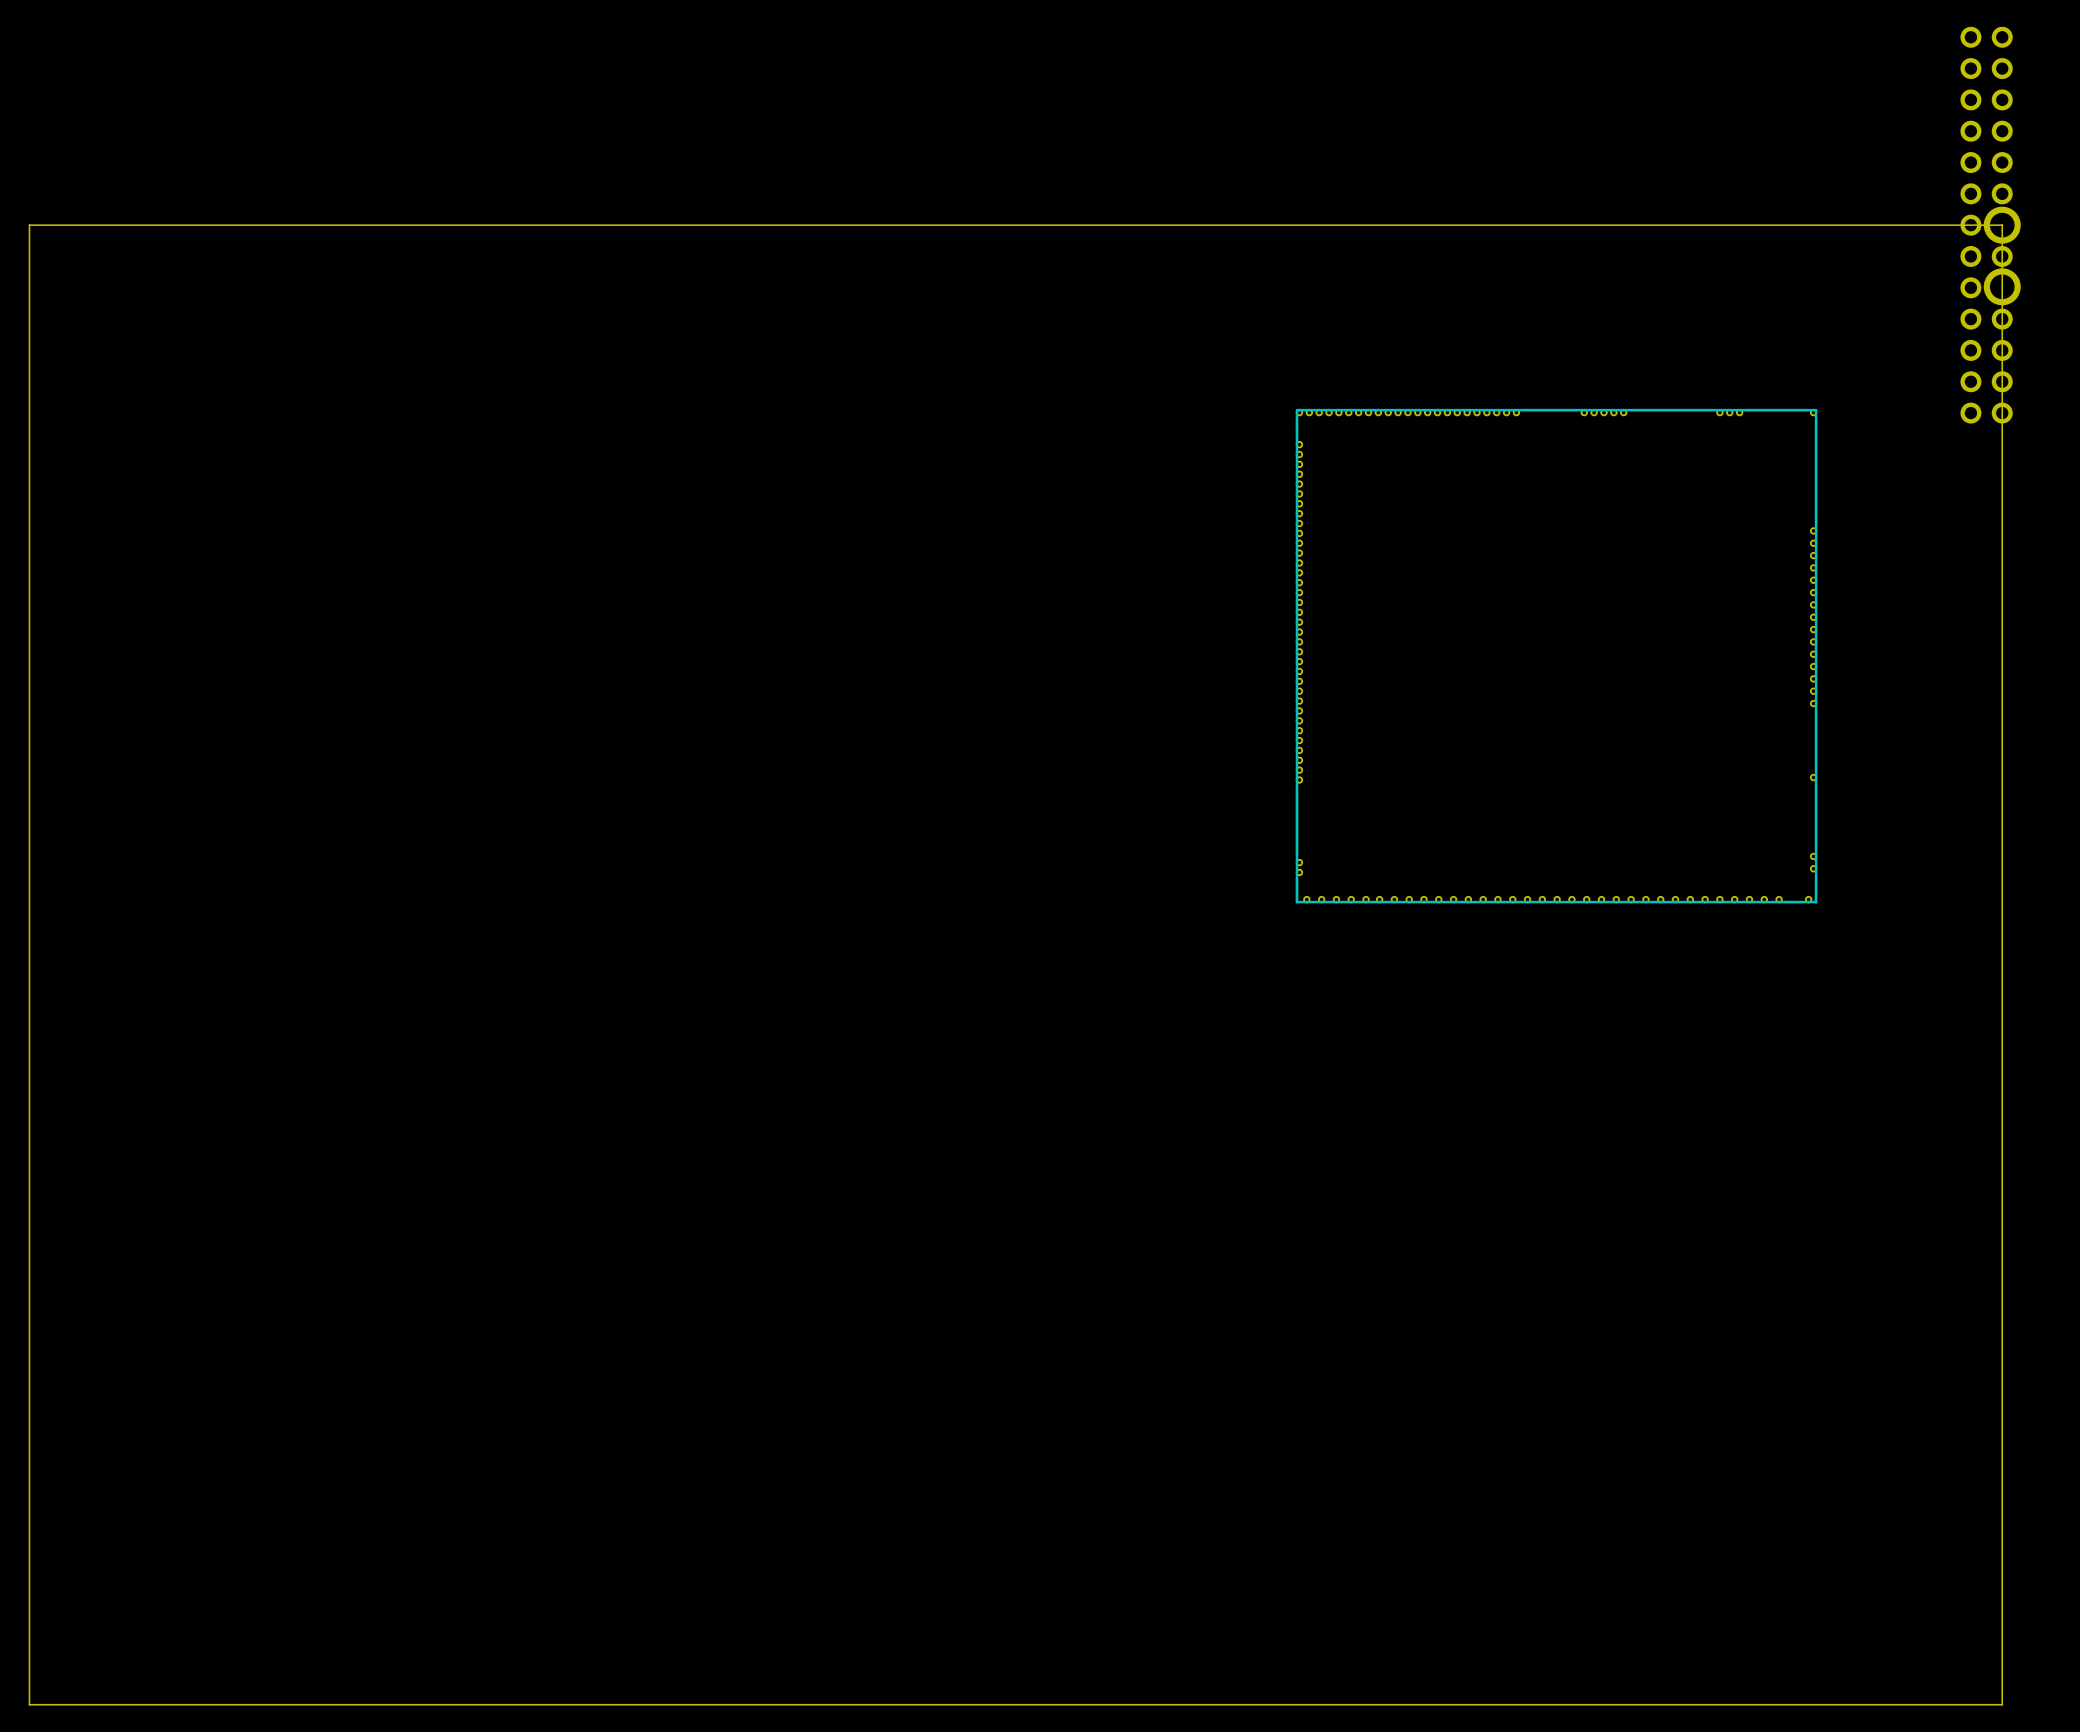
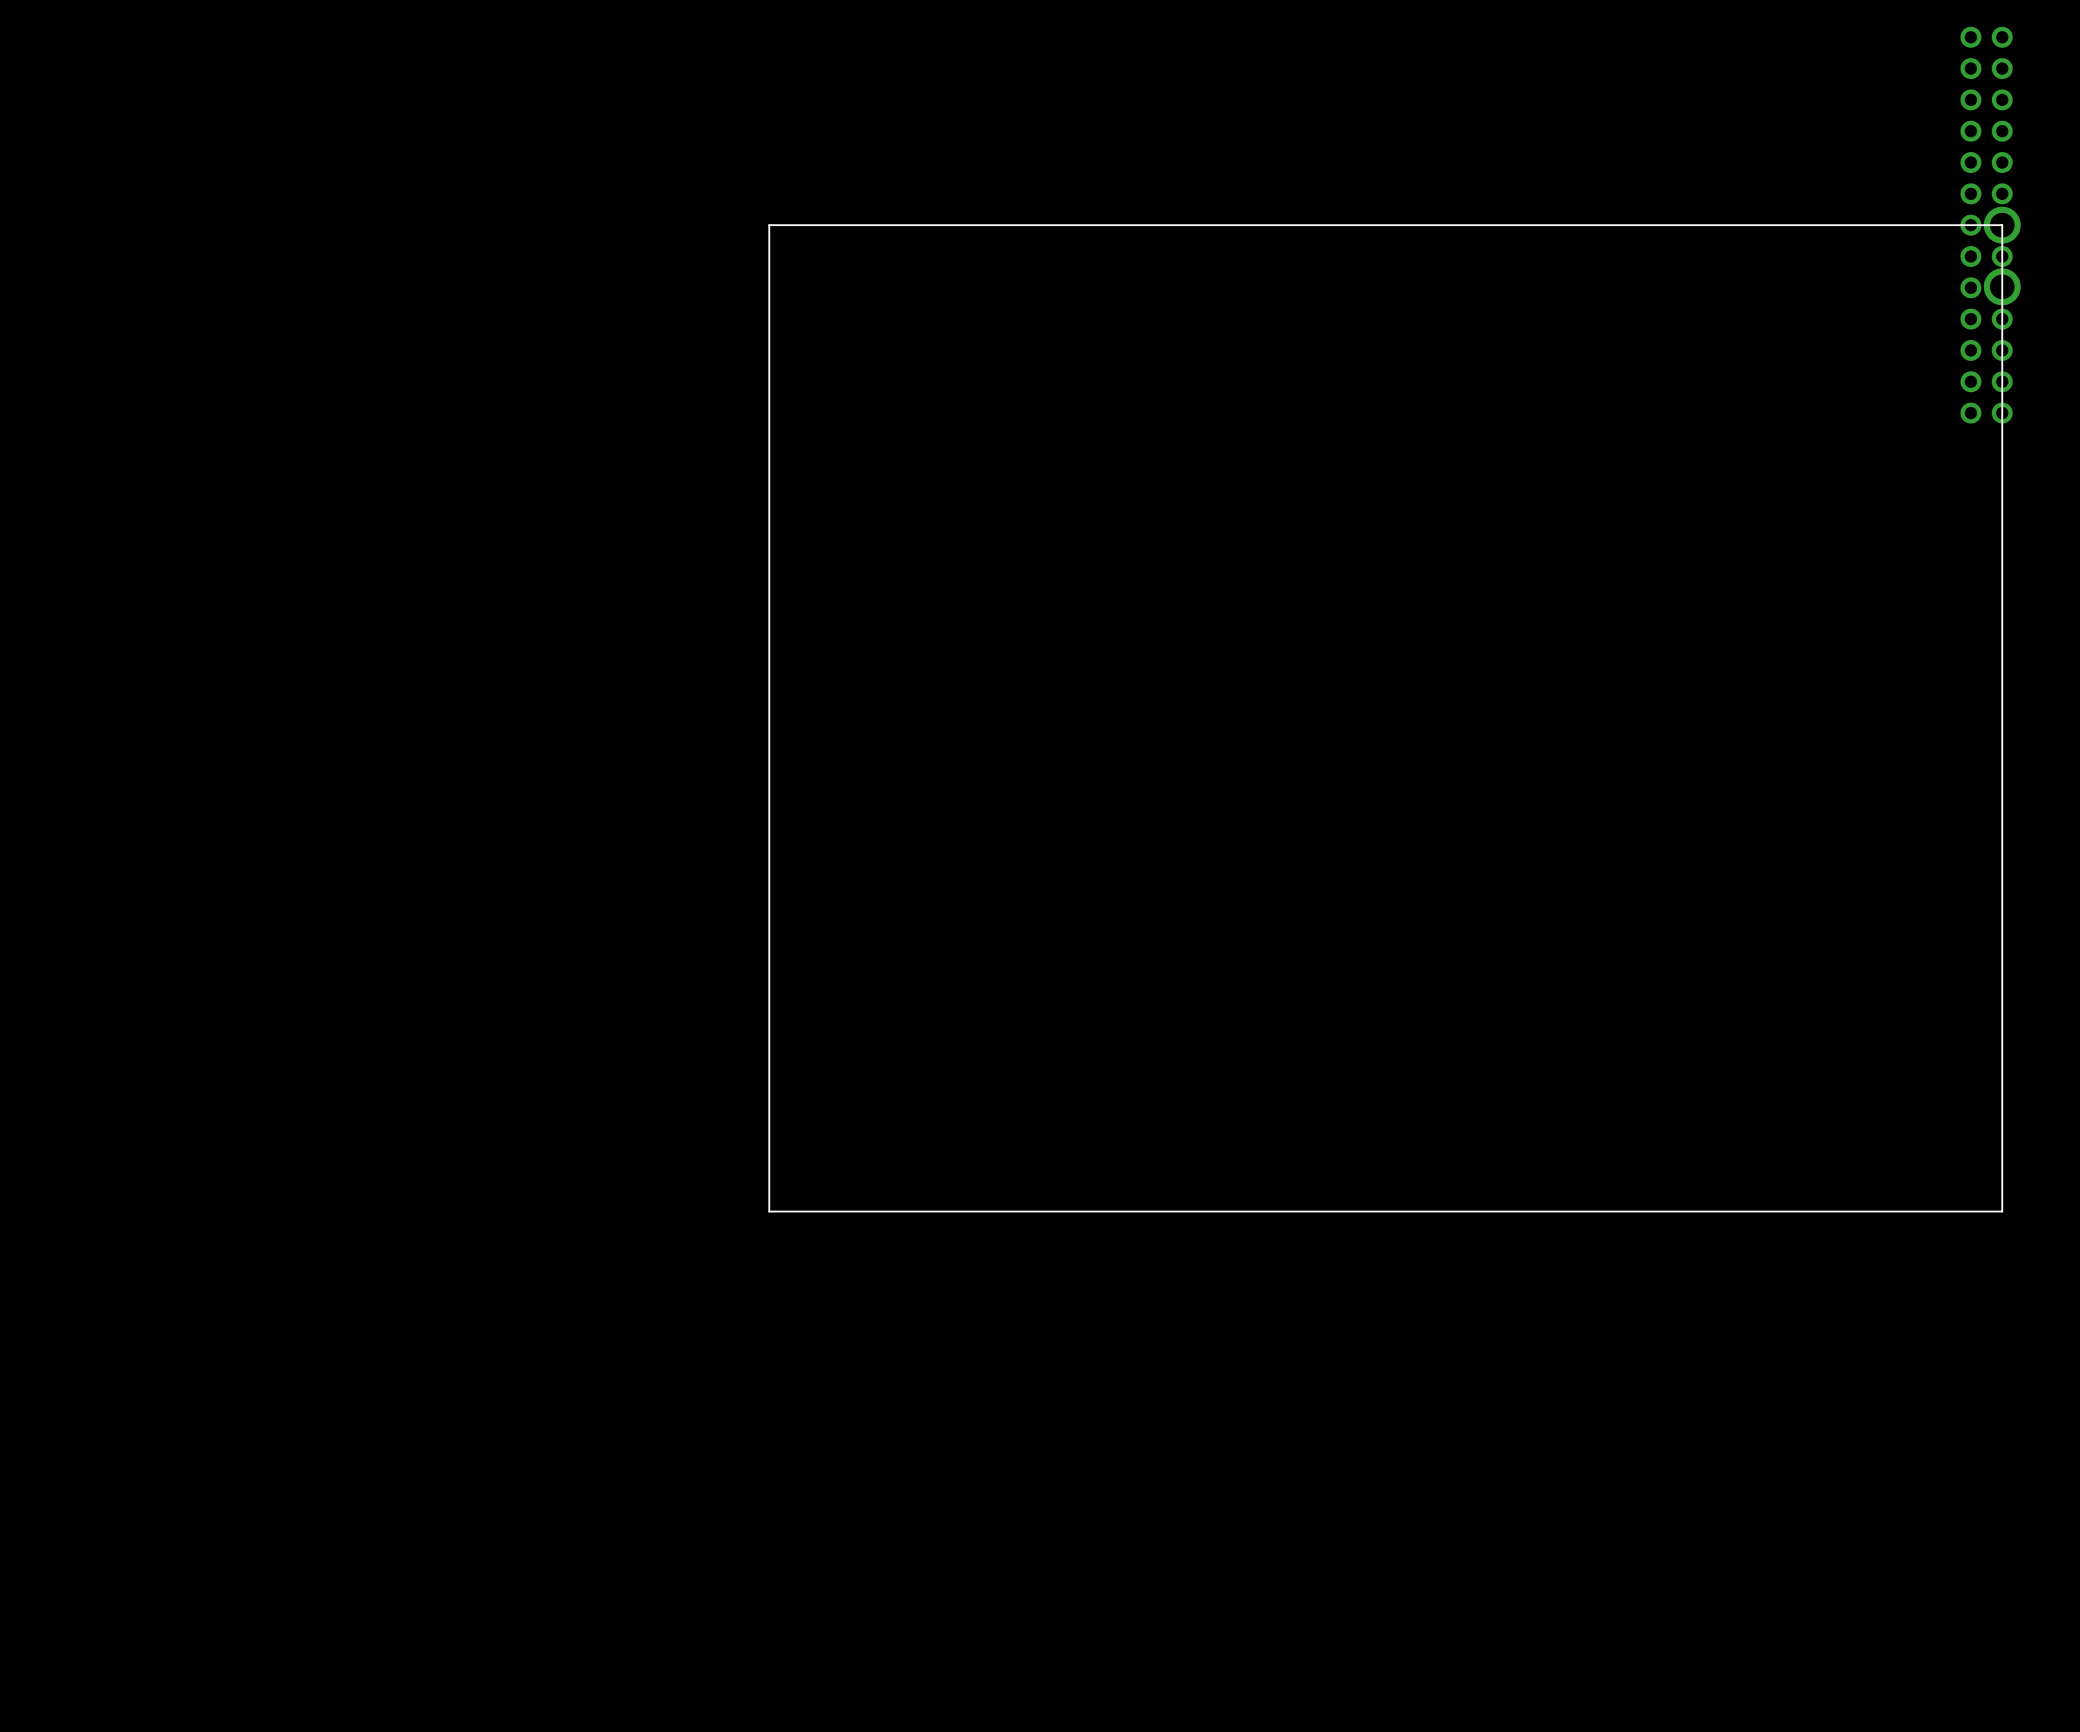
board edge: (769, 225) (29, 225) (29, 1704) (2002, 1704) (2002, 1211) -> (769, 225) (769, 1211) (2002, 1211)
part: (1556, 656) -> none

